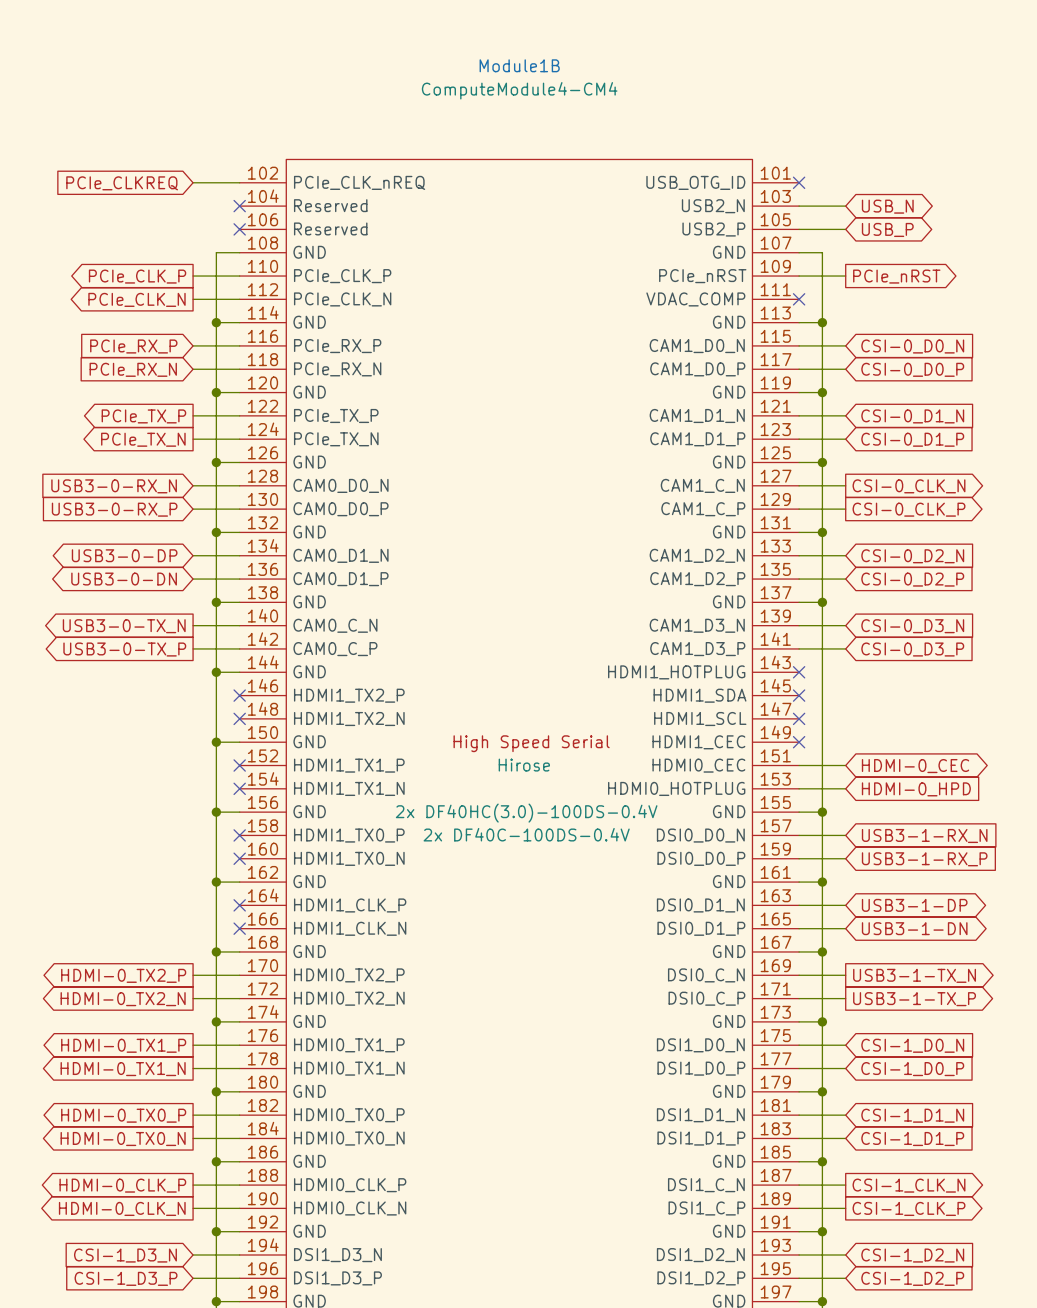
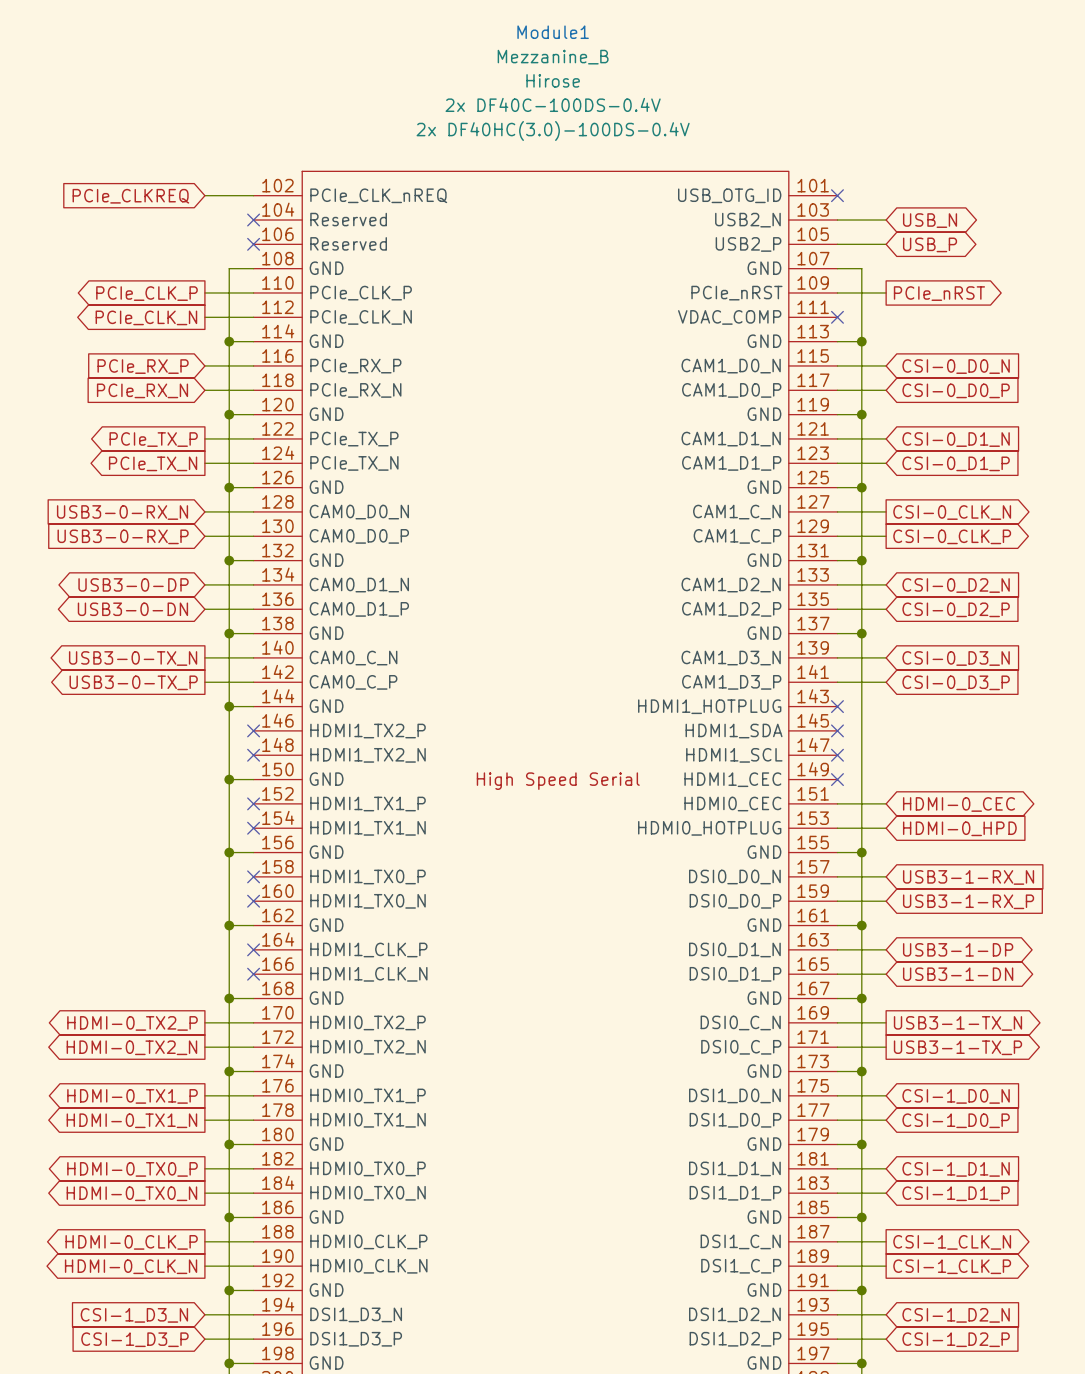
Module1B name: Module1B (519, 65) -> Module1 (553, 32)
Module1B value: ComputeModule4-CM4 (519, 90) -> Mezzanine_B (553, 57)
Module1B text position: Hirose (524, 765) -> Hirose (553, 80)
Module1B text position: 2x DF40HC(3.0)-100DS-0.4V (526, 813) -> 2x DF40HC(3.0)-100DS-0.4V (553, 130)
Module1B text position: 2x DF40C-100DS-0.4V (526, 834) -> 2x DF40C-100DS-0.4V (553, 104)

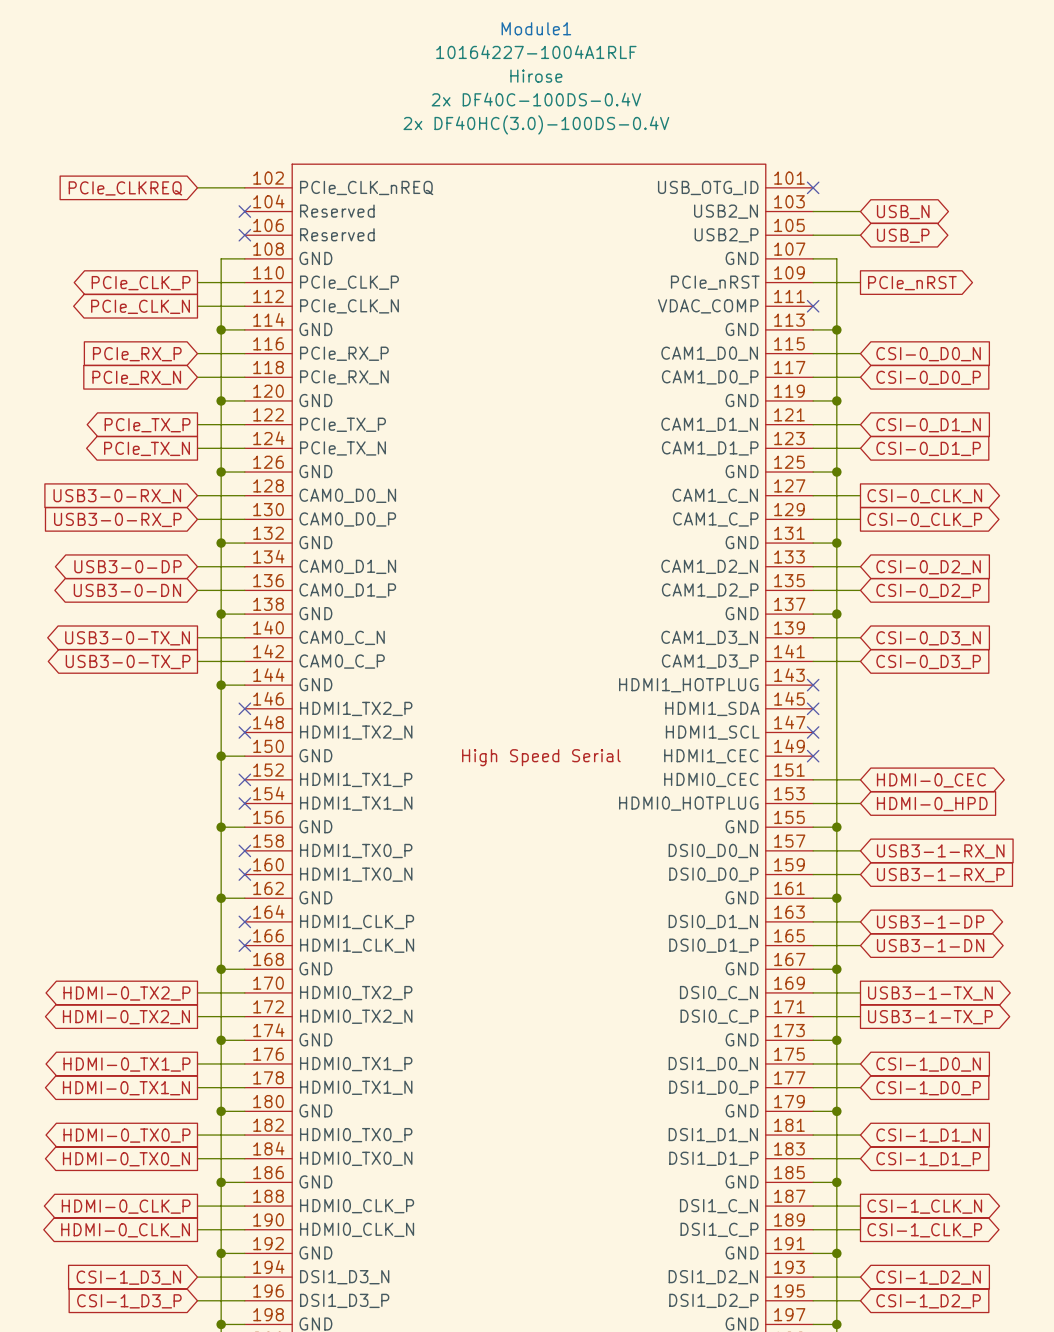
Module1 value: Mezzanine_B (553, 57) -> 10164227-1004A1RLF (536, 52)

